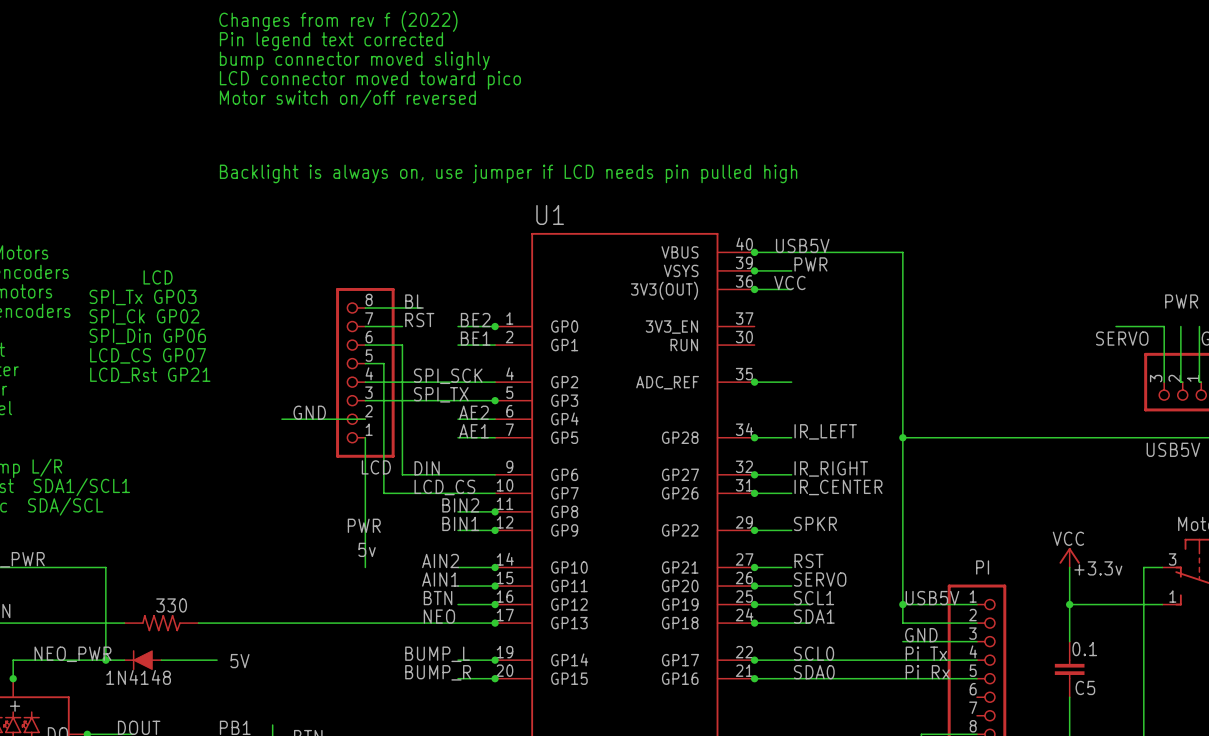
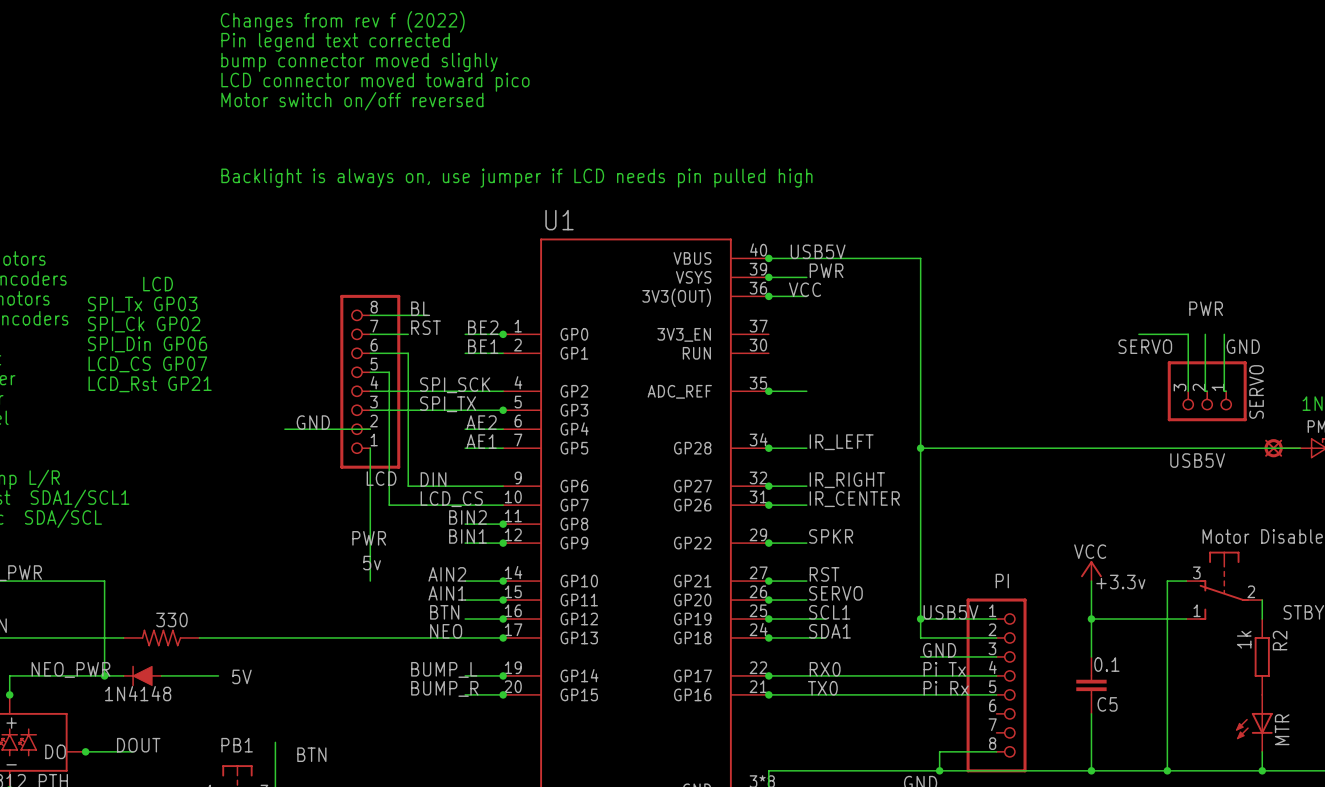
label: SCL0 (814, 653) -> RX0 (825, 669)
label: SDA0 (814, 672) -> TX0 (822, 688)

